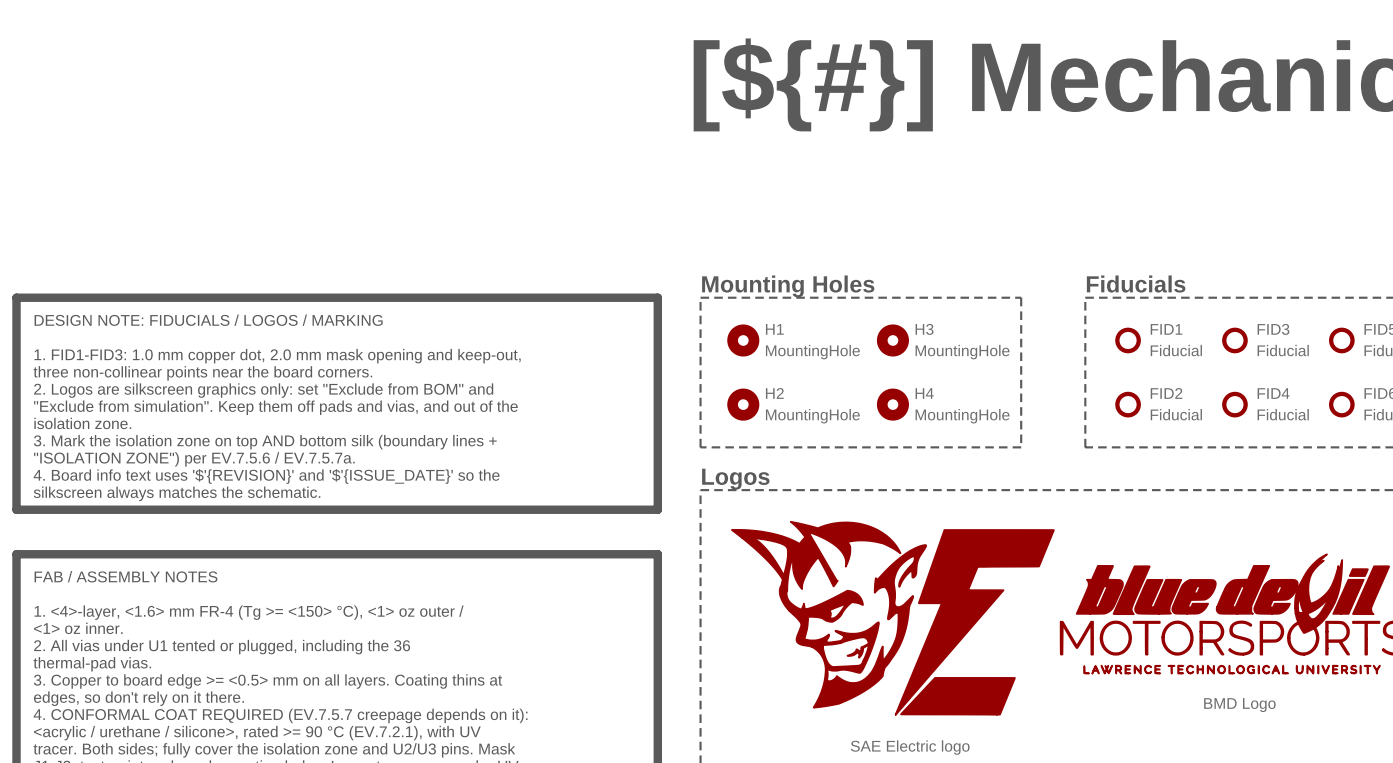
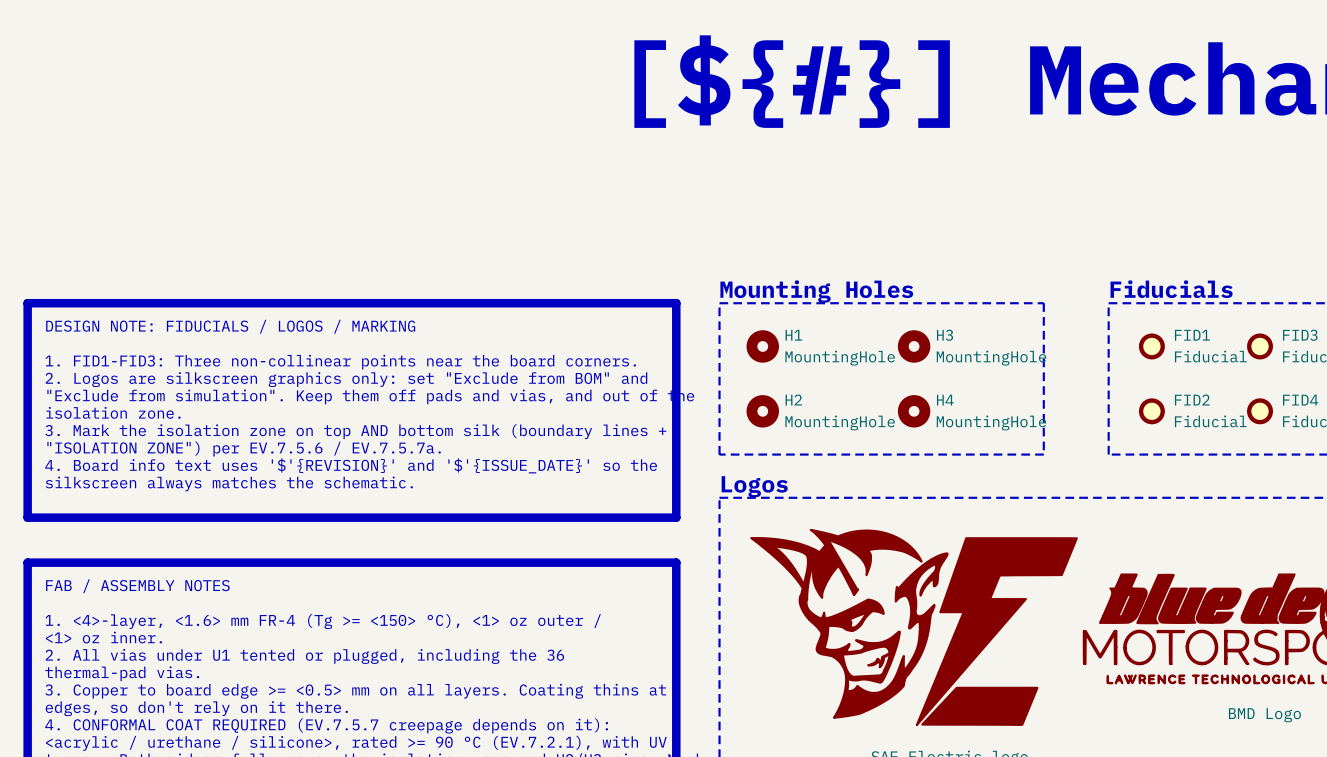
text: 1. FID1-FID3: 1.0 mm copper dot, 2.0 mm mask opening and keep-out, (277, 356) -> 1. FID1-FID3: Three non-collinear points near the board corners. (340, 362)
text: three non-collinear points near the board corners. (202, 373) -> 2. Logos are silkscreen graphics only: set "Exclude from BOM" and (346, 379)
text: 2. Logos are silkscreen graphics only: set "Exclude from BOM" and (263, 390) -> "Exclude from simulation". Keep them off pads and vias, and out of the (370, 396)
text: "Exclude from simulation". Keep them off pads and vias, and out of the (275, 407) -> isolation zone. (113, 412)
text: isolation zone. (82, 423) -> 3. Mark the isolation zone on top AND bottom silk (boundary lines + (355, 431)
text: 3. Mark the isolation zone on top AND bottom silk (boundary lines + (265, 442) -> "ISOLATION ZONE") per EV.7.5.6 / EV.7.5.7a. (244, 449)
text: "ISOLATION ZONE") per EV.7.5.6 / EV.7.5.7a. (194, 459) -> 4. Board info text uses '$'{REVISION}' and '$'{ISSUE_DATE}' so the (351, 465)
text: 4. Board info text uses '$'{REVISION}' and '$'{ISSUE_DATE}' so the (266, 476) -> silkscreen always matches the schematic. (229, 483)
text: silkscreen always matches the schematic. (177, 493) -> none

